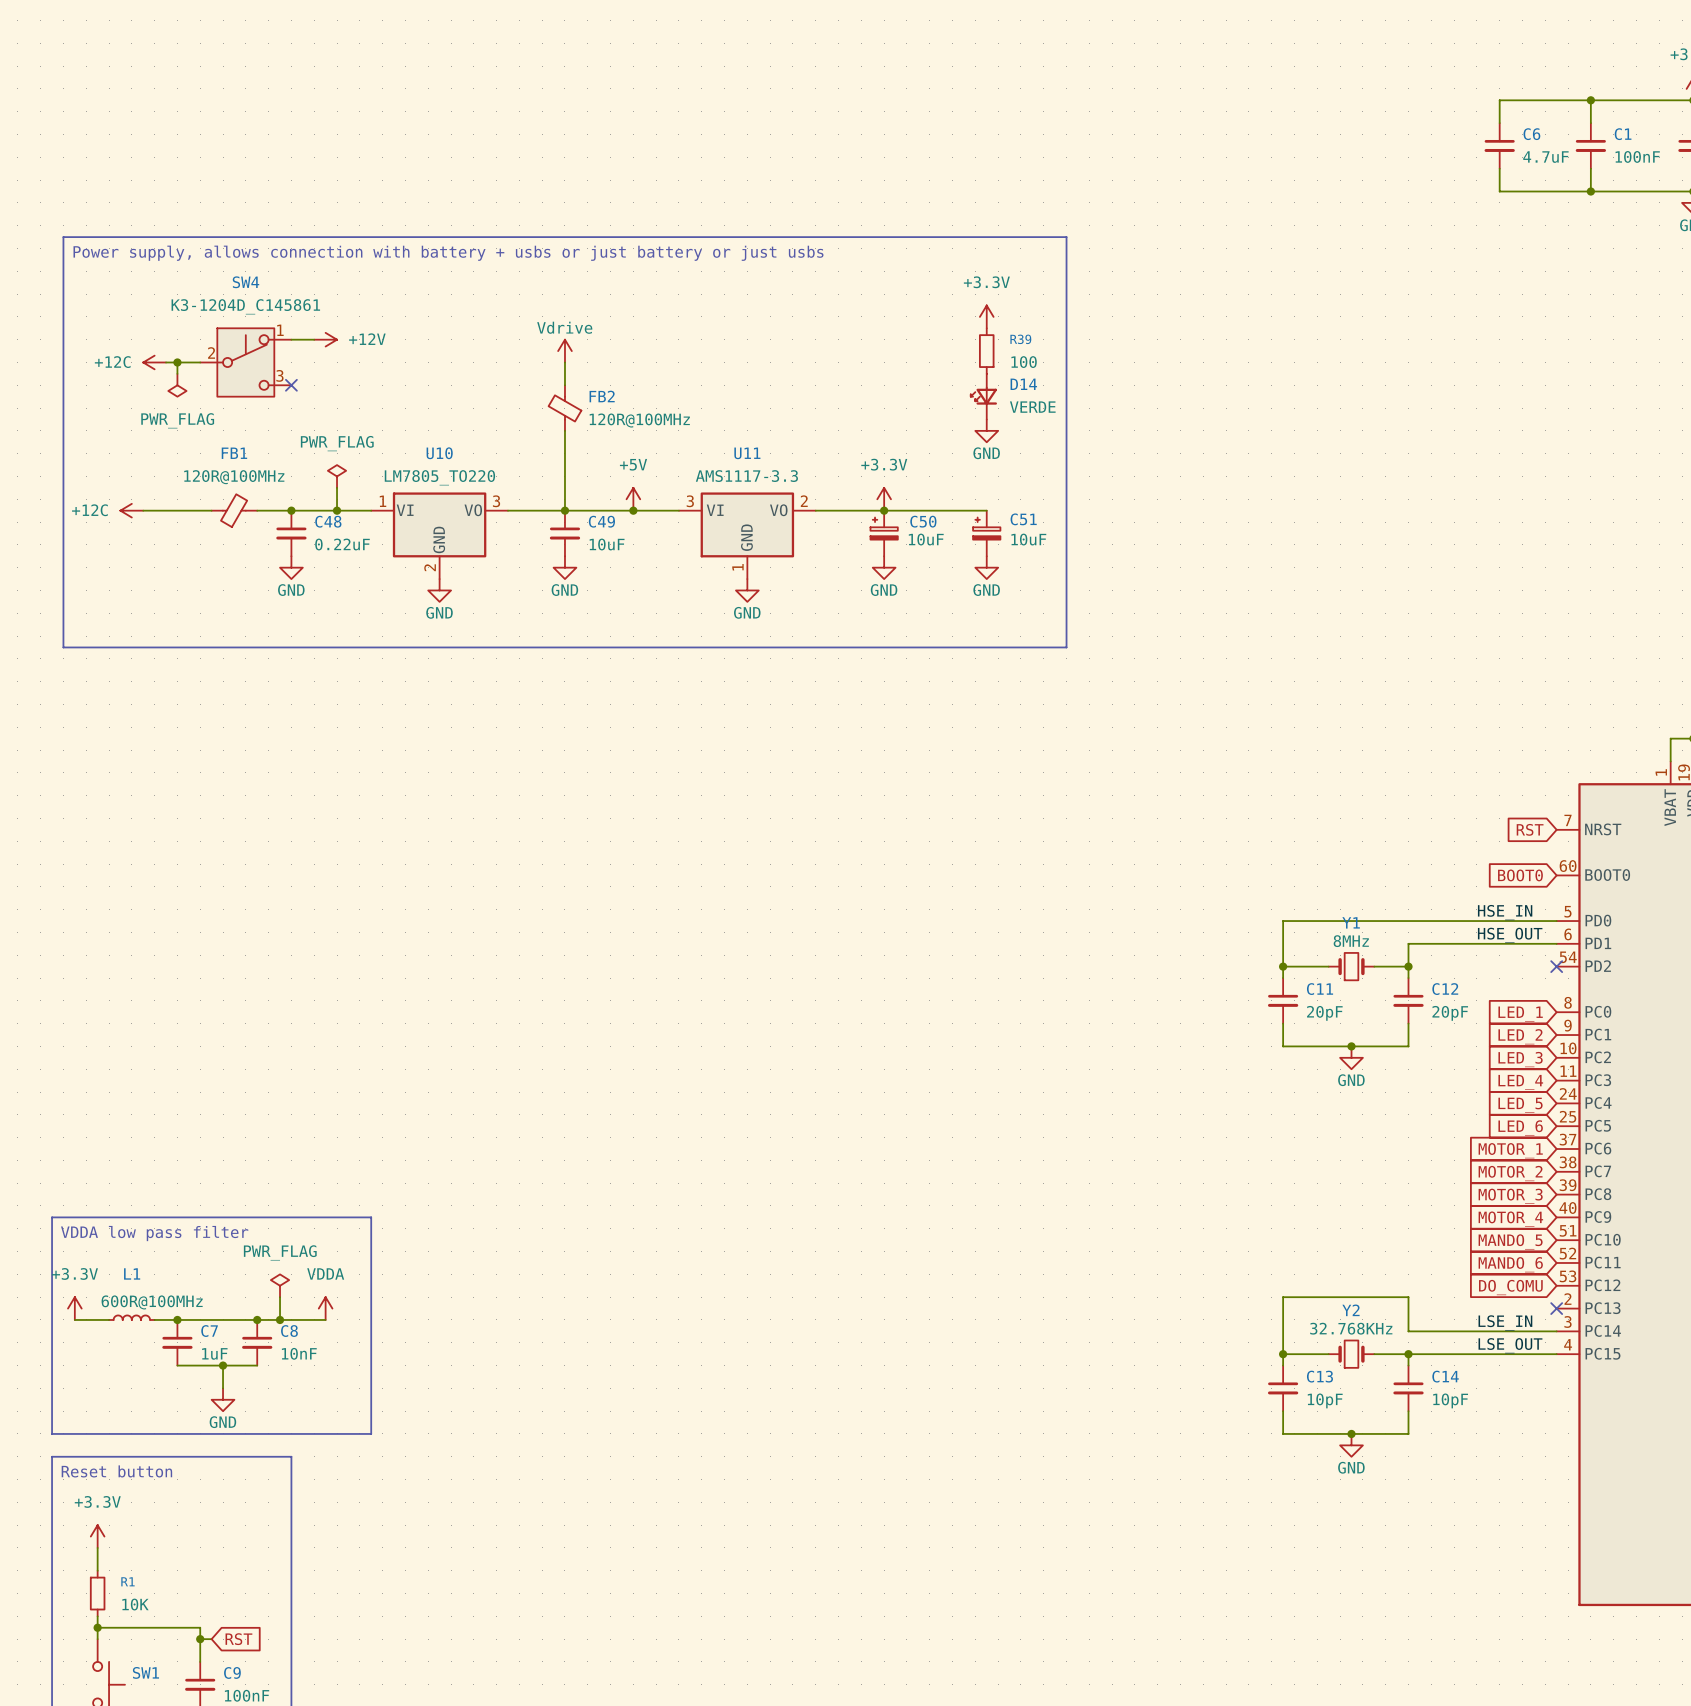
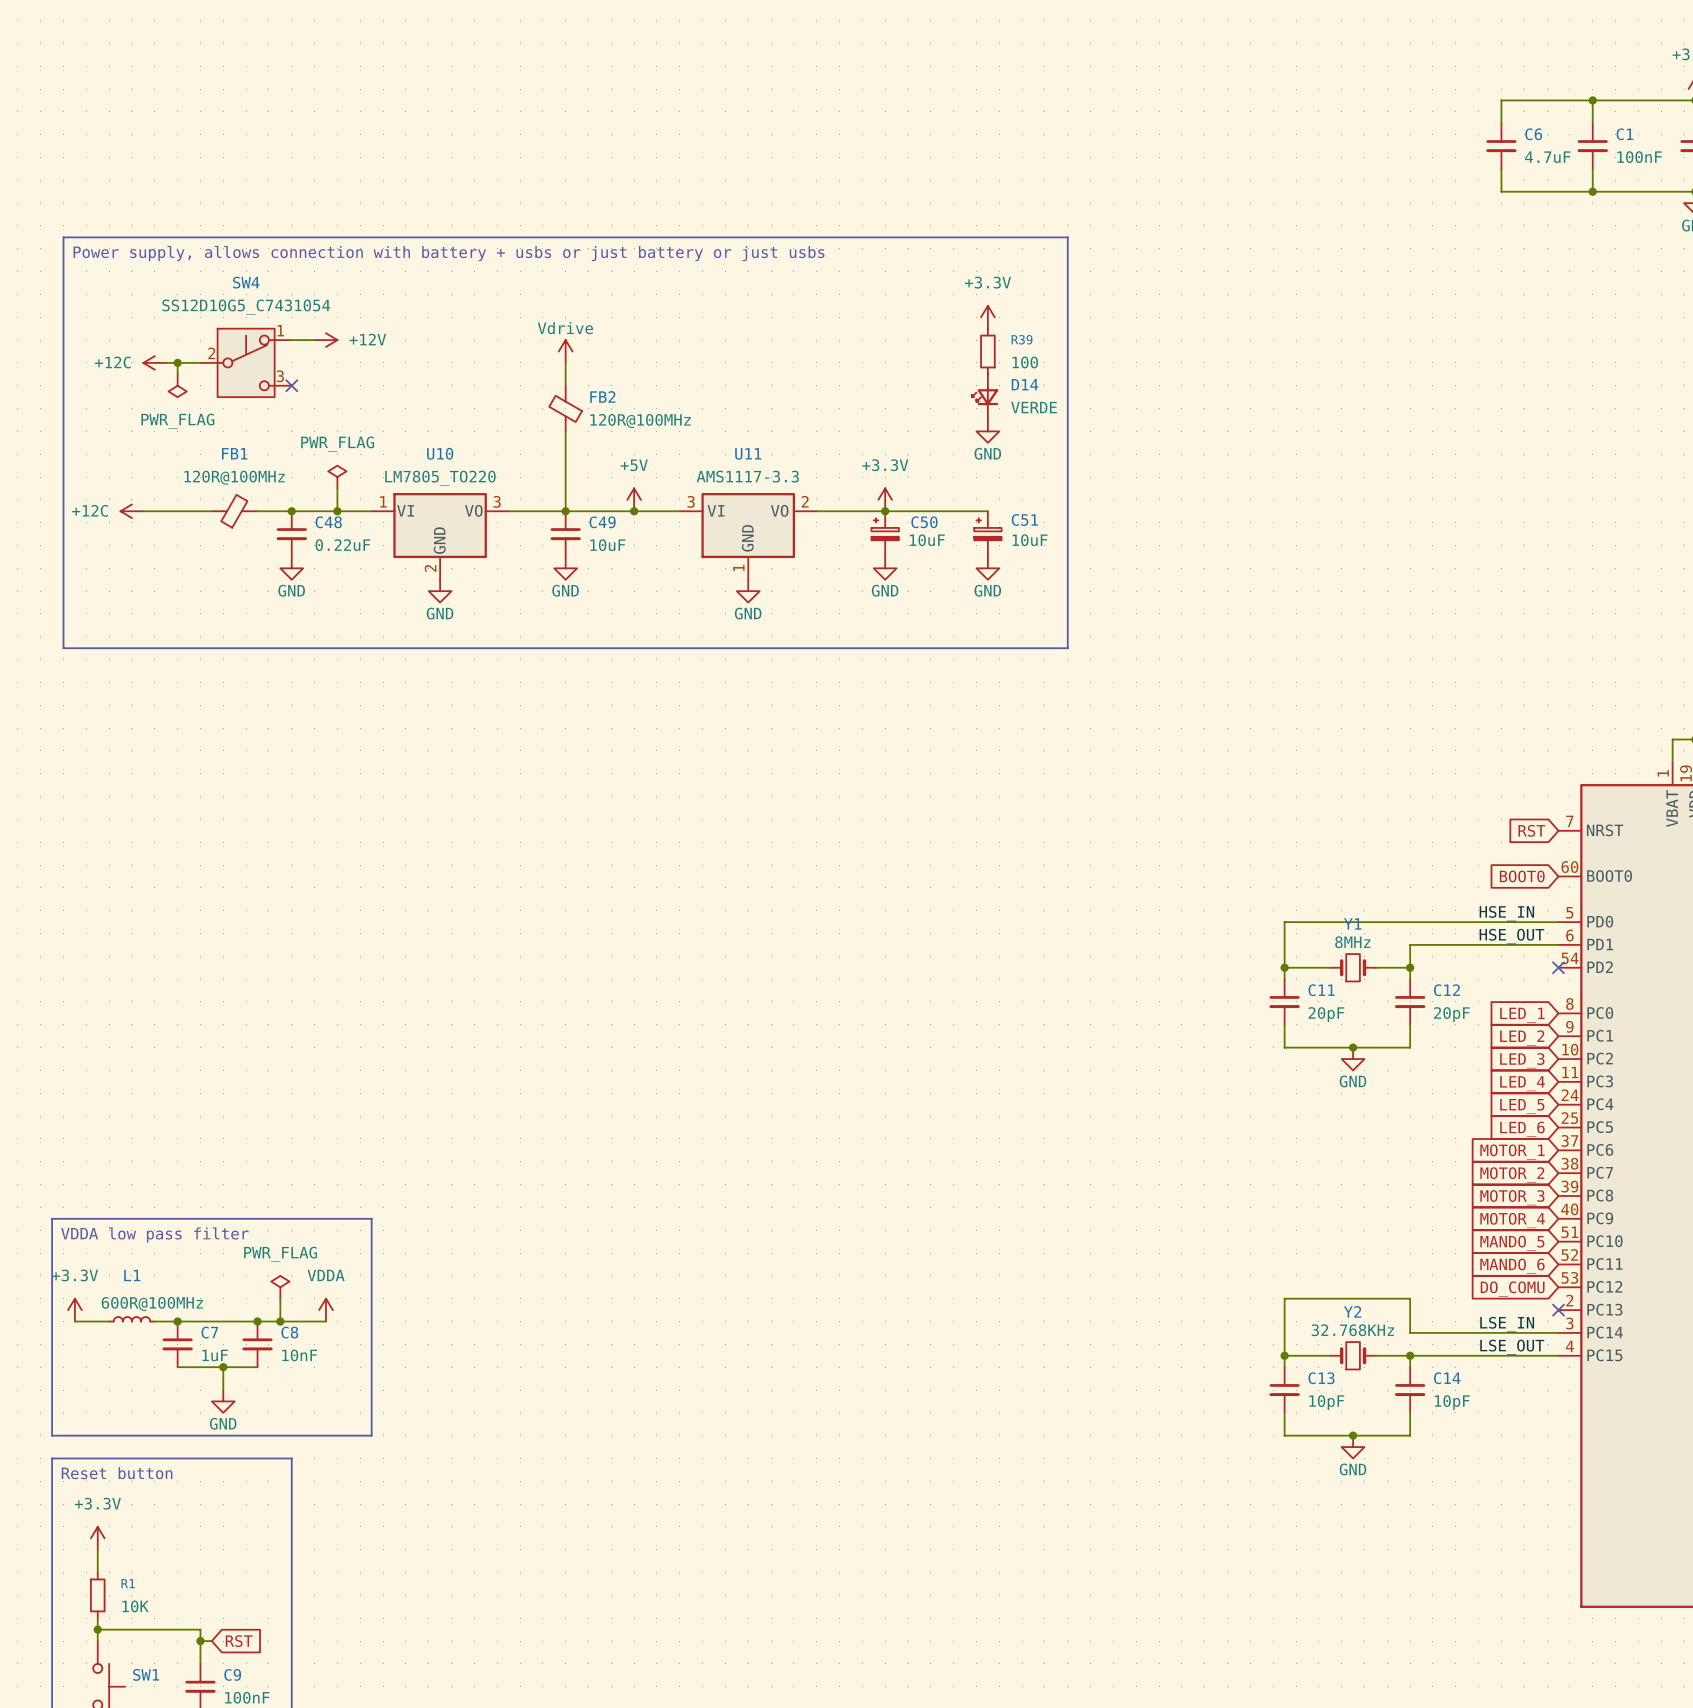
SW4 value: K3-1204D_C145861 (245, 306) -> SS12D10G5_C7431054 (246, 307)

